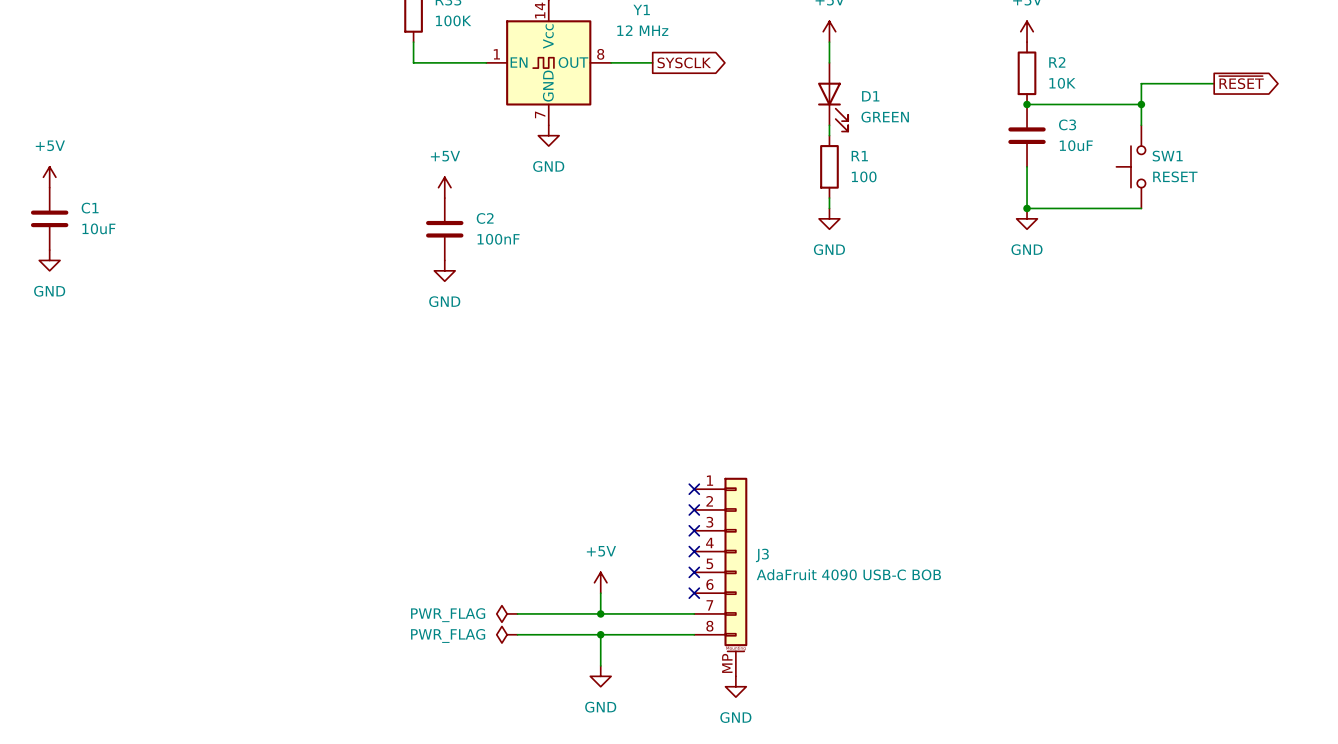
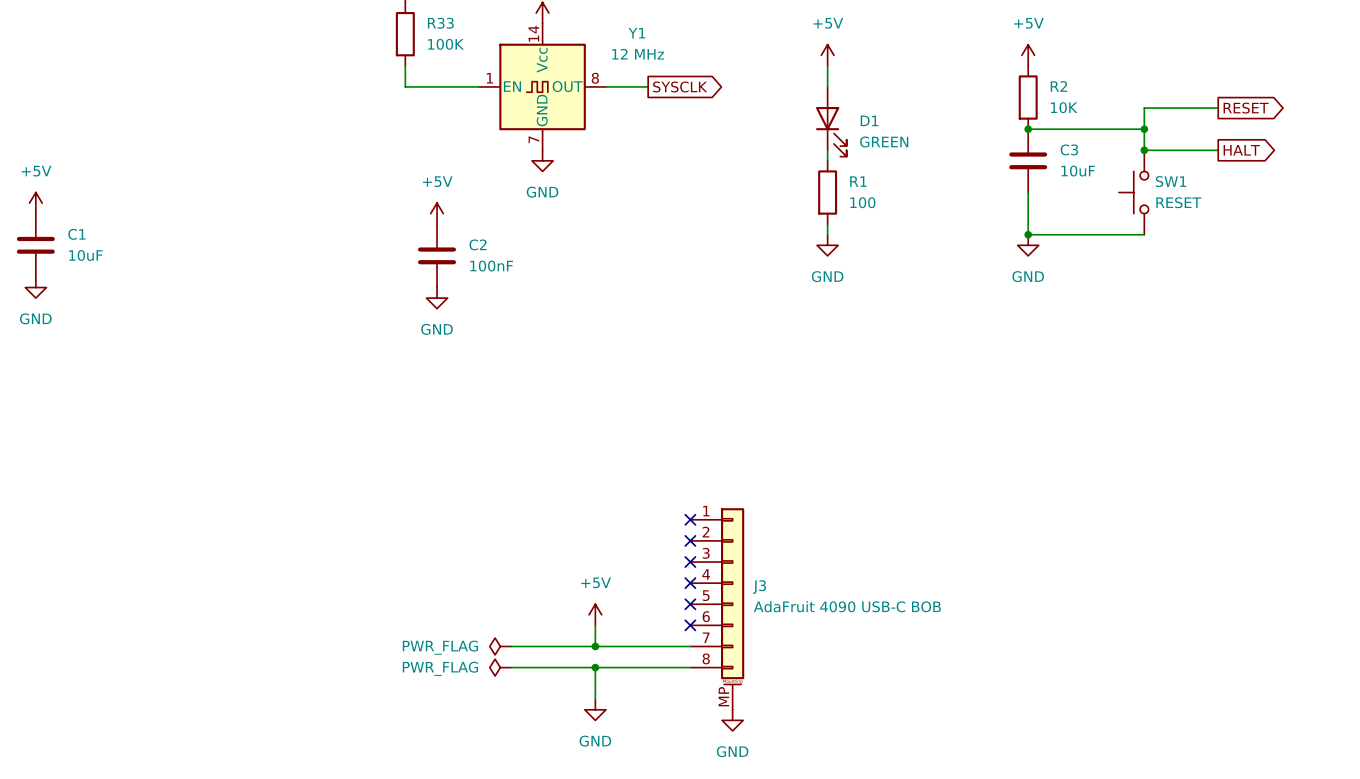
global label: ~{RESET} (1241, 82) -> RESET (1246, 108)
wire: none -> (1144, 150) (1218, 150)
junction: none -> (1144, 150)
global label: none -> HALT (1241, 150)

